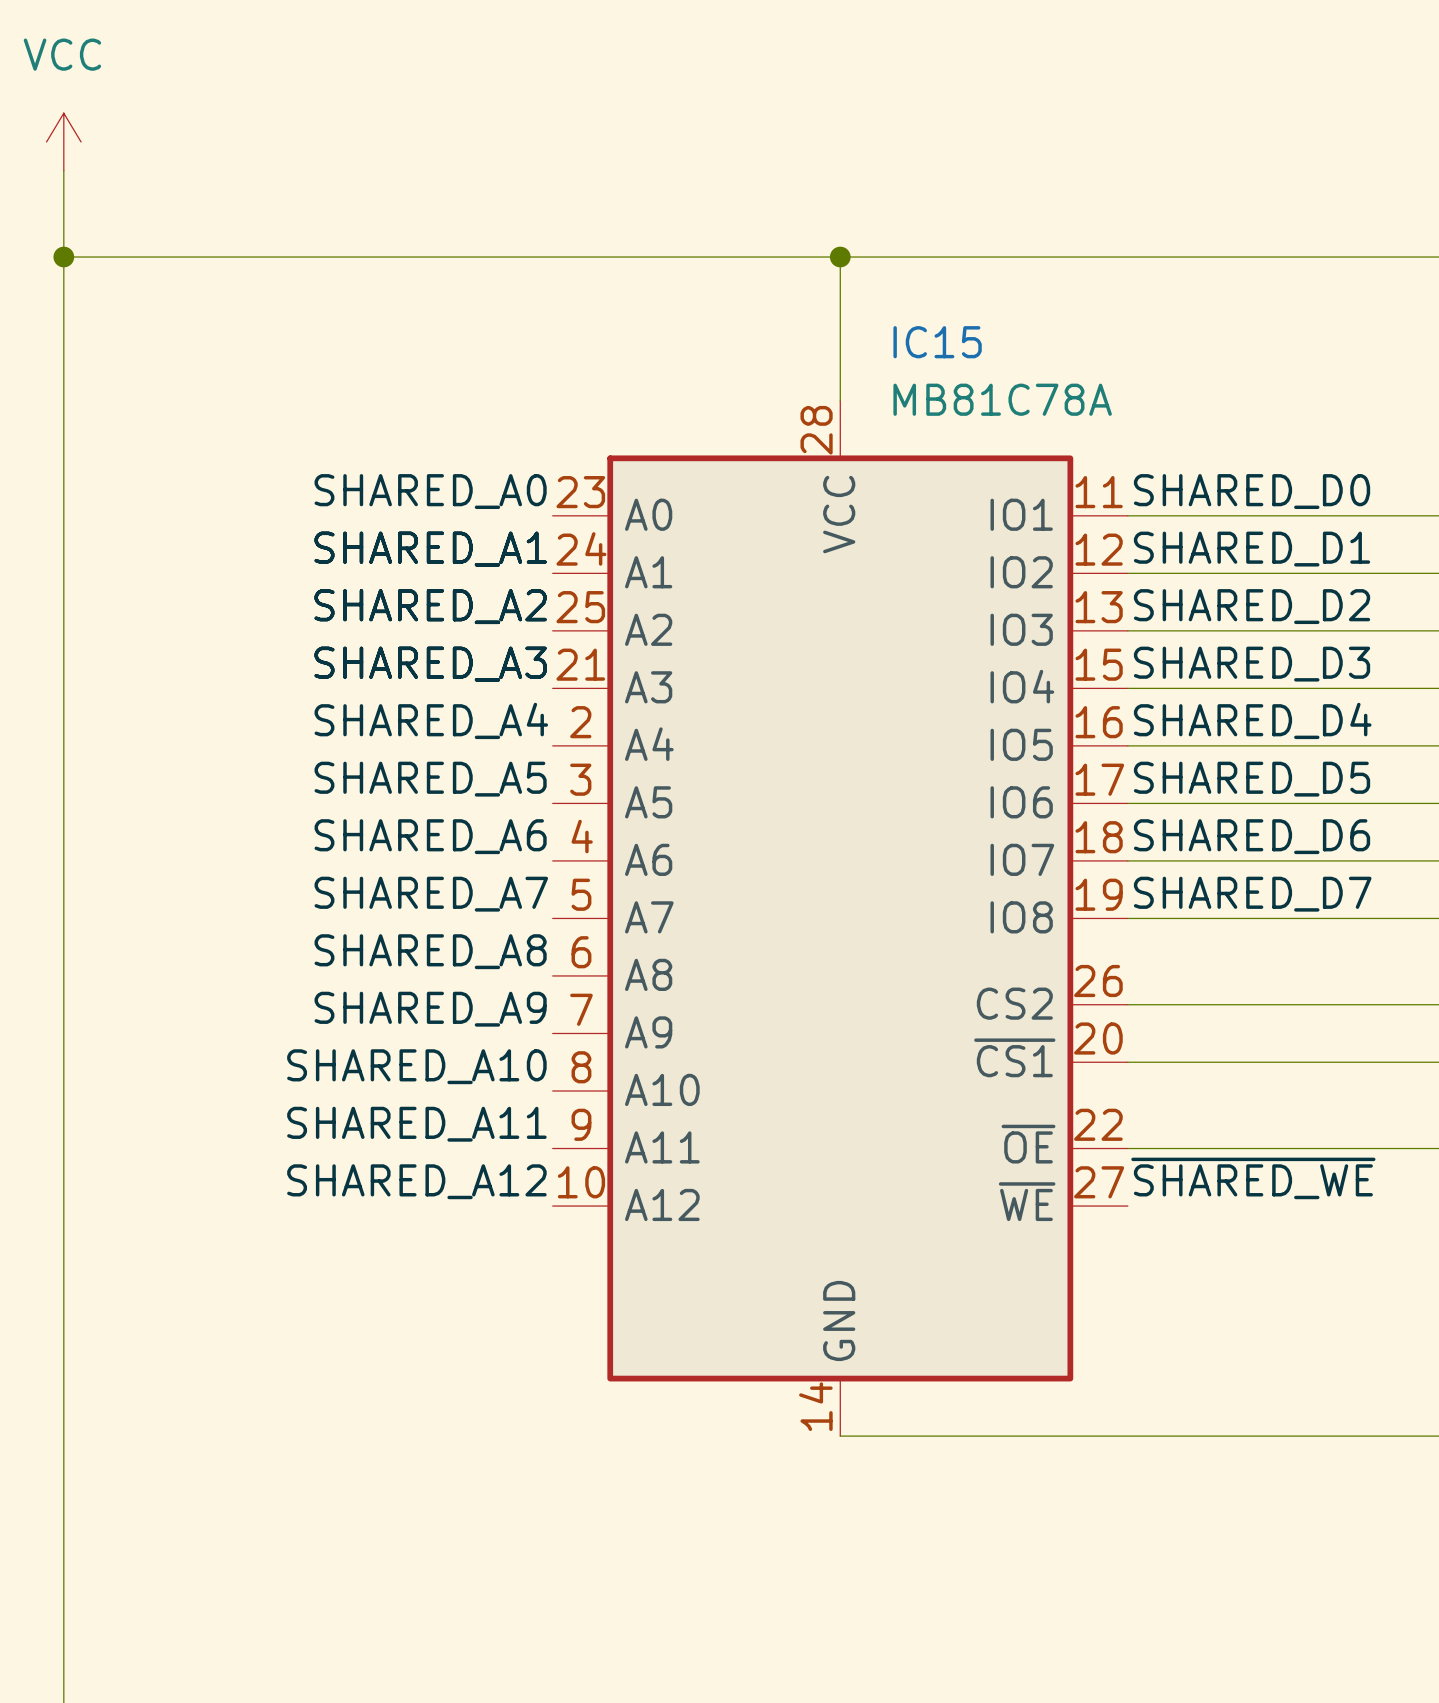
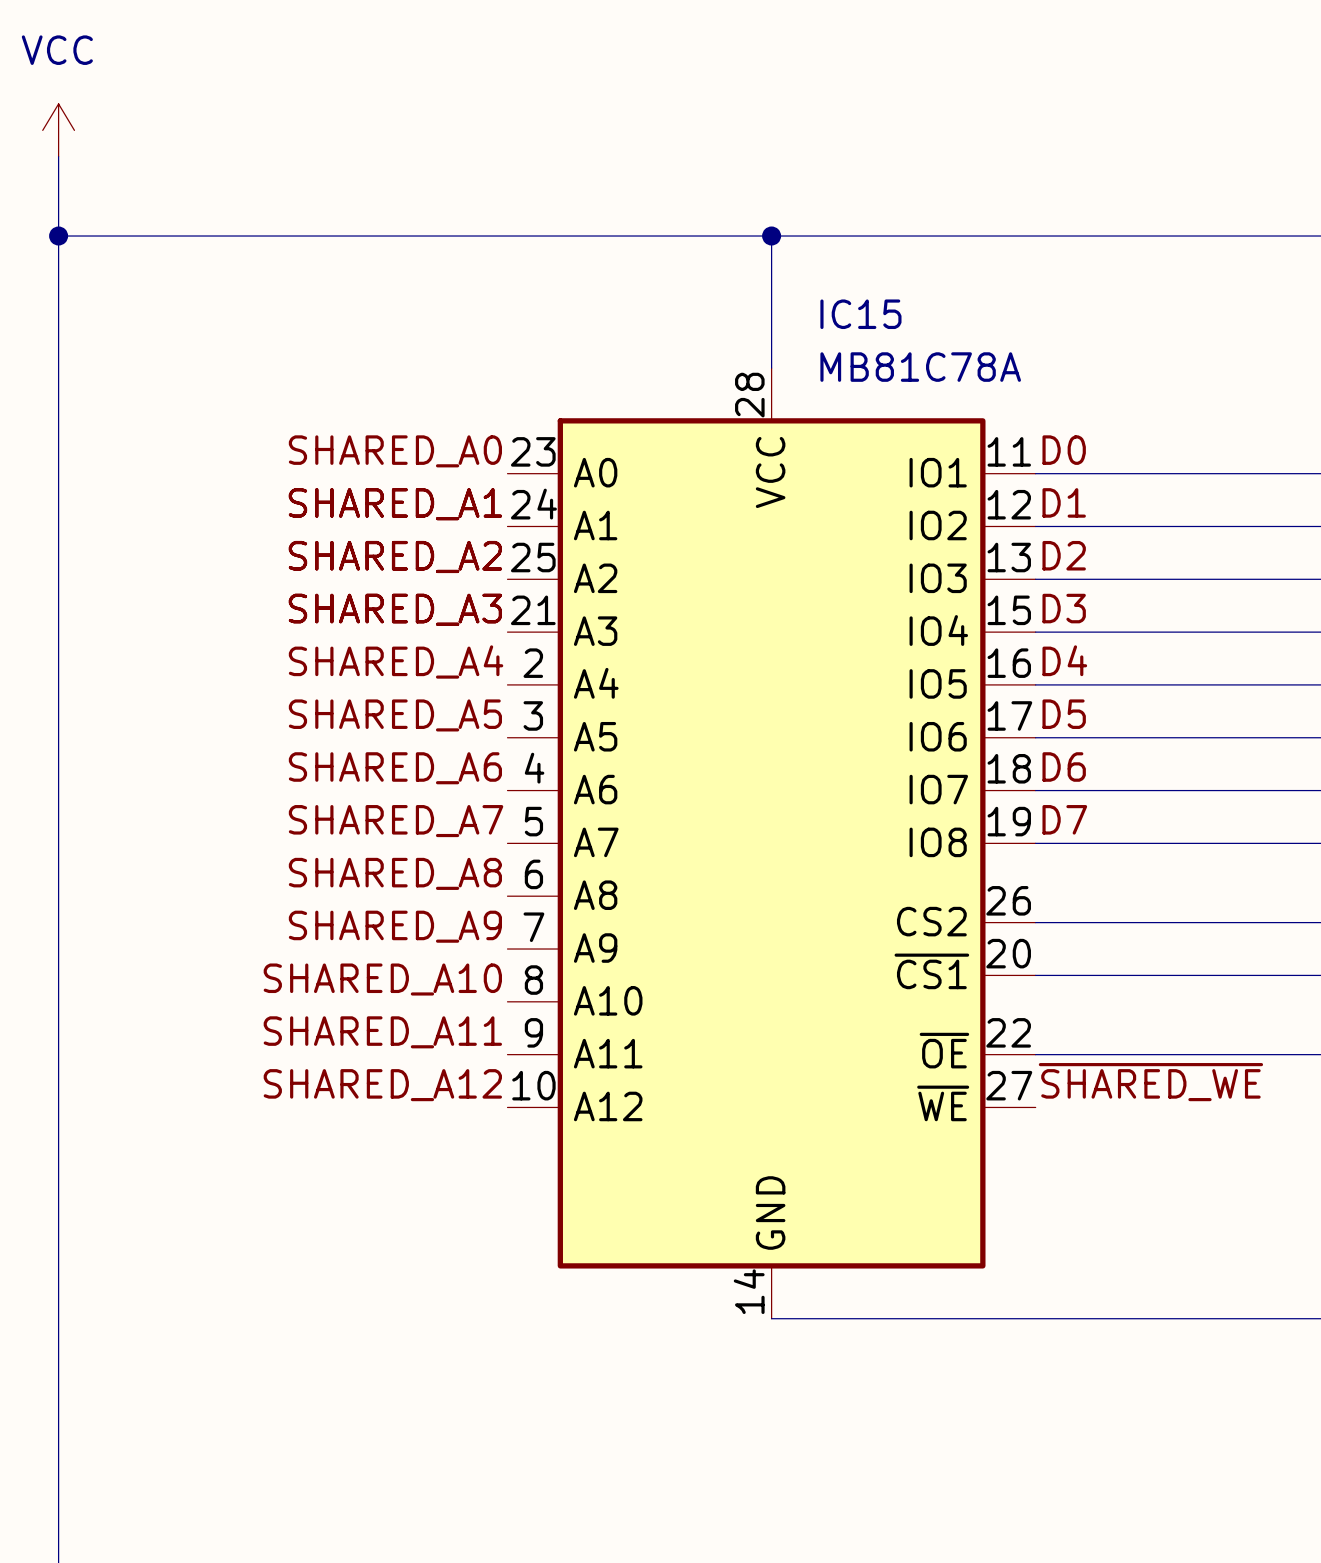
label: SHARED_D0 (1252, 491) -> D0 (1064, 450)
label: SHARED_D1 (1252, 549) -> D1 (1064, 502)
label: SHARED_D2 (1252, 606) -> D2 (1064, 555)
label: SHARED_D3 (1252, 664) -> D3 (1064, 608)
label: SHARED_D4 (1252, 720) -> D4 (1064, 660)
label: SHARED_D5 (1252, 779) -> D5 (1064, 714)
label: SHARED_D6 (1252, 836) -> D6 (1064, 766)
label: SHARED_D7 (1252, 894) -> D7 (1064, 819)

